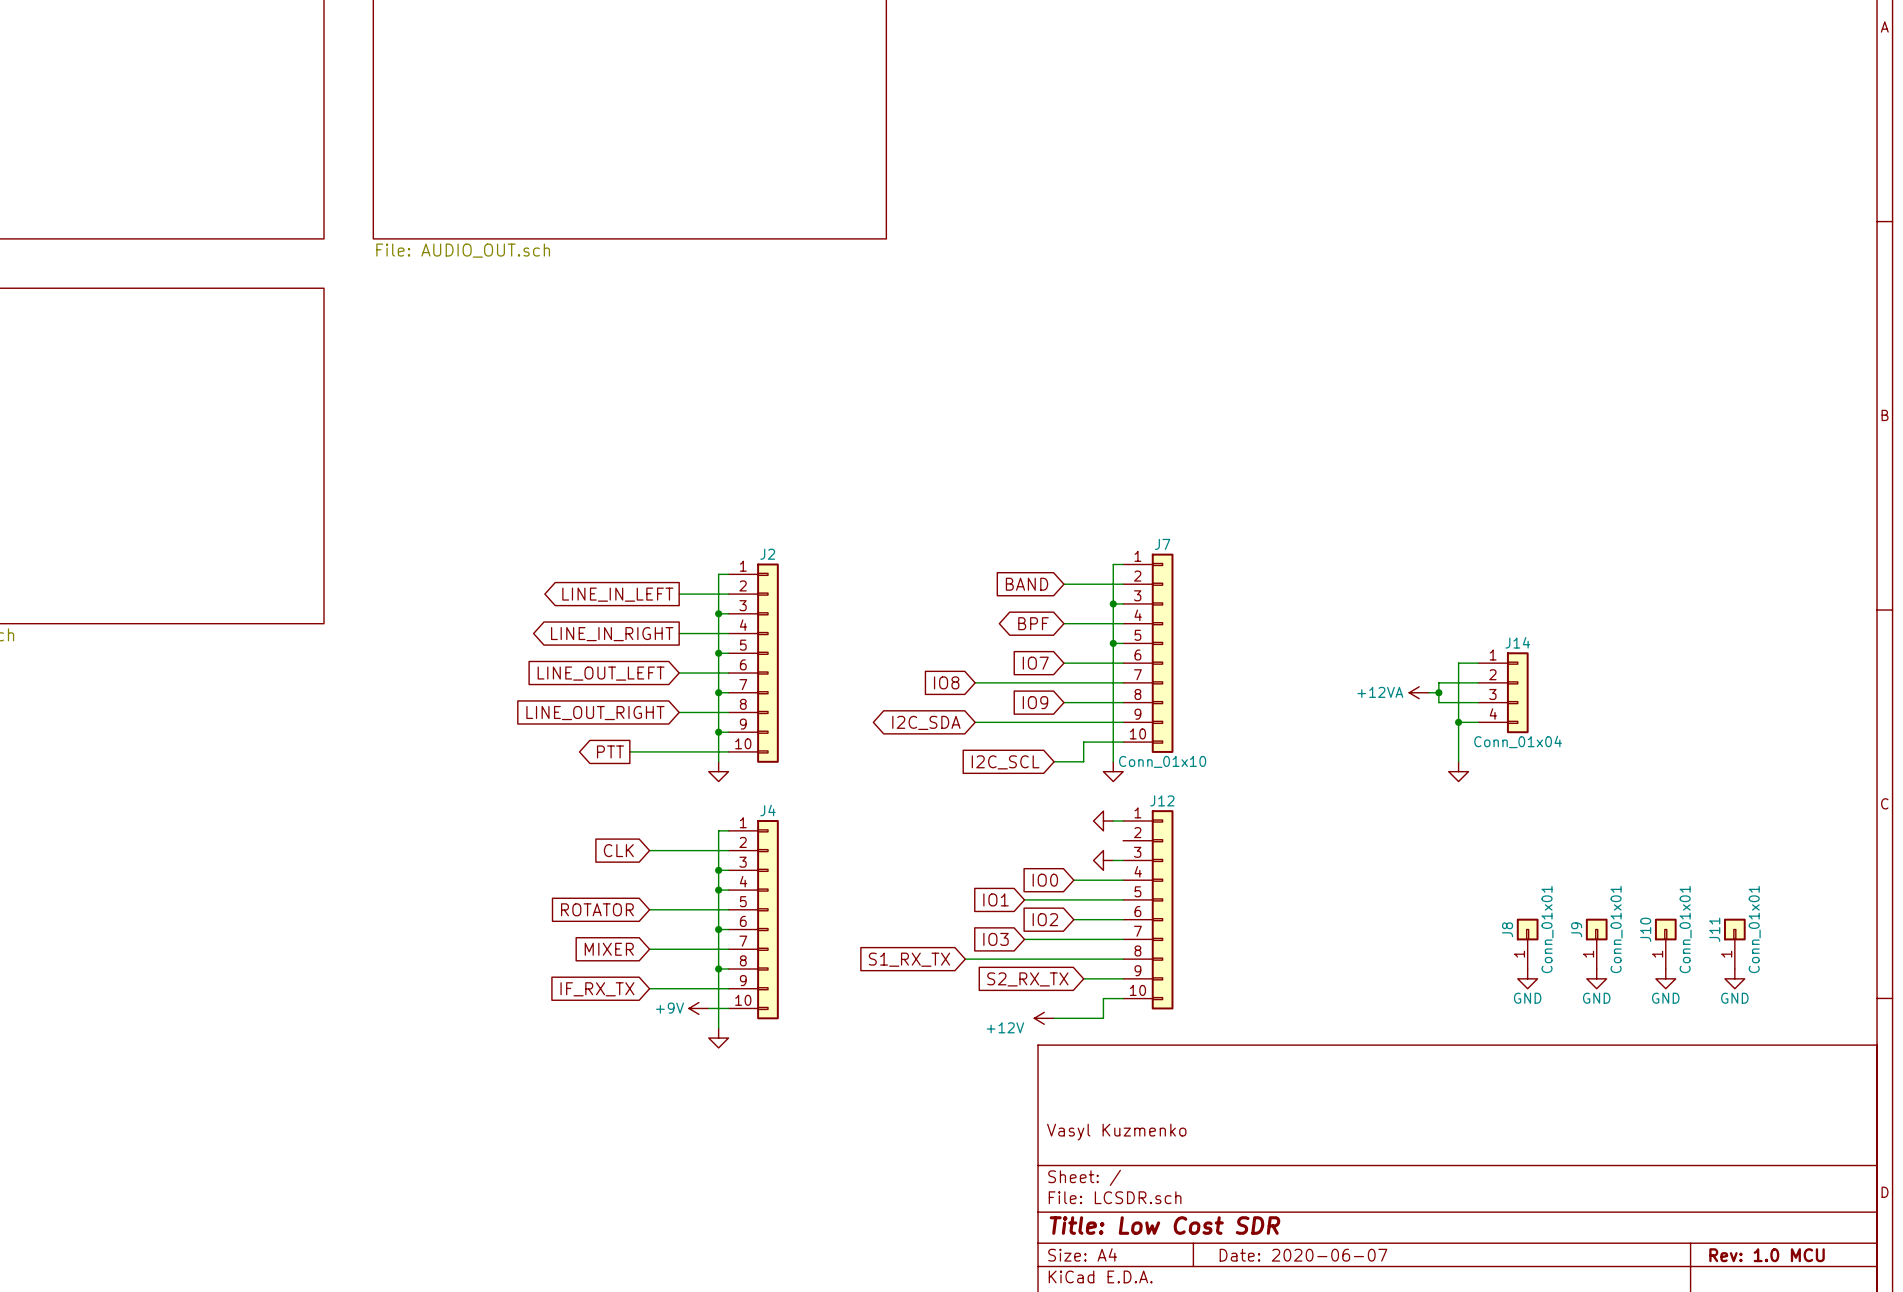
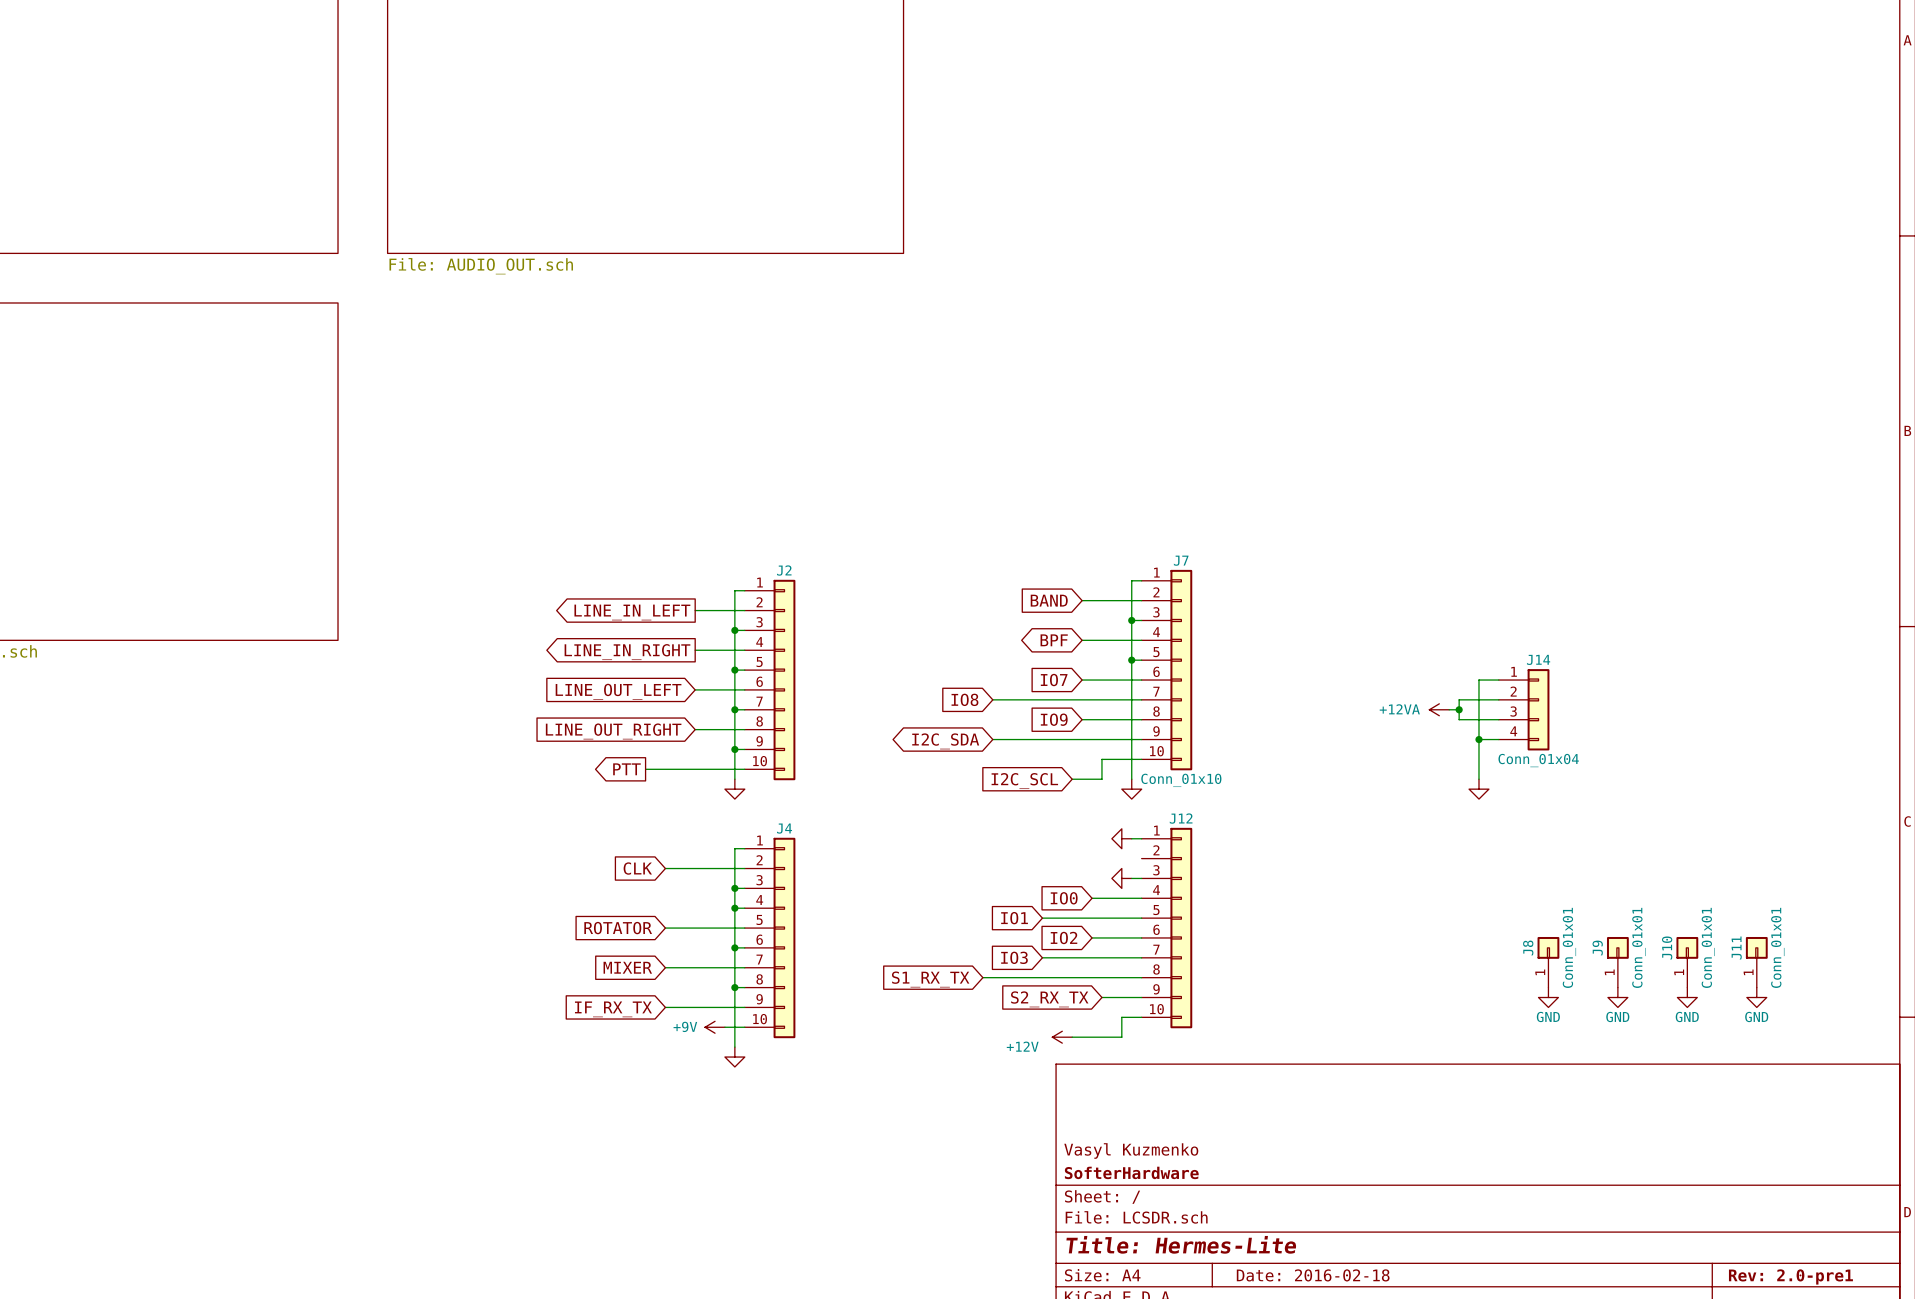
title block: none -> SofterHardware (1131, 1172)
title block: Title: Low Cost SDR (1165, 1225) -> Title: Hermes-Lite (1181, 1244)
title block: Date: 2020-06-07 (1303, 1255) -> Date: 2016-02-18 (1313, 1275)
title block: Rev: 1.0 MCU (1767, 1255) -> Rev: 2.0-pre1 (1790, 1276)

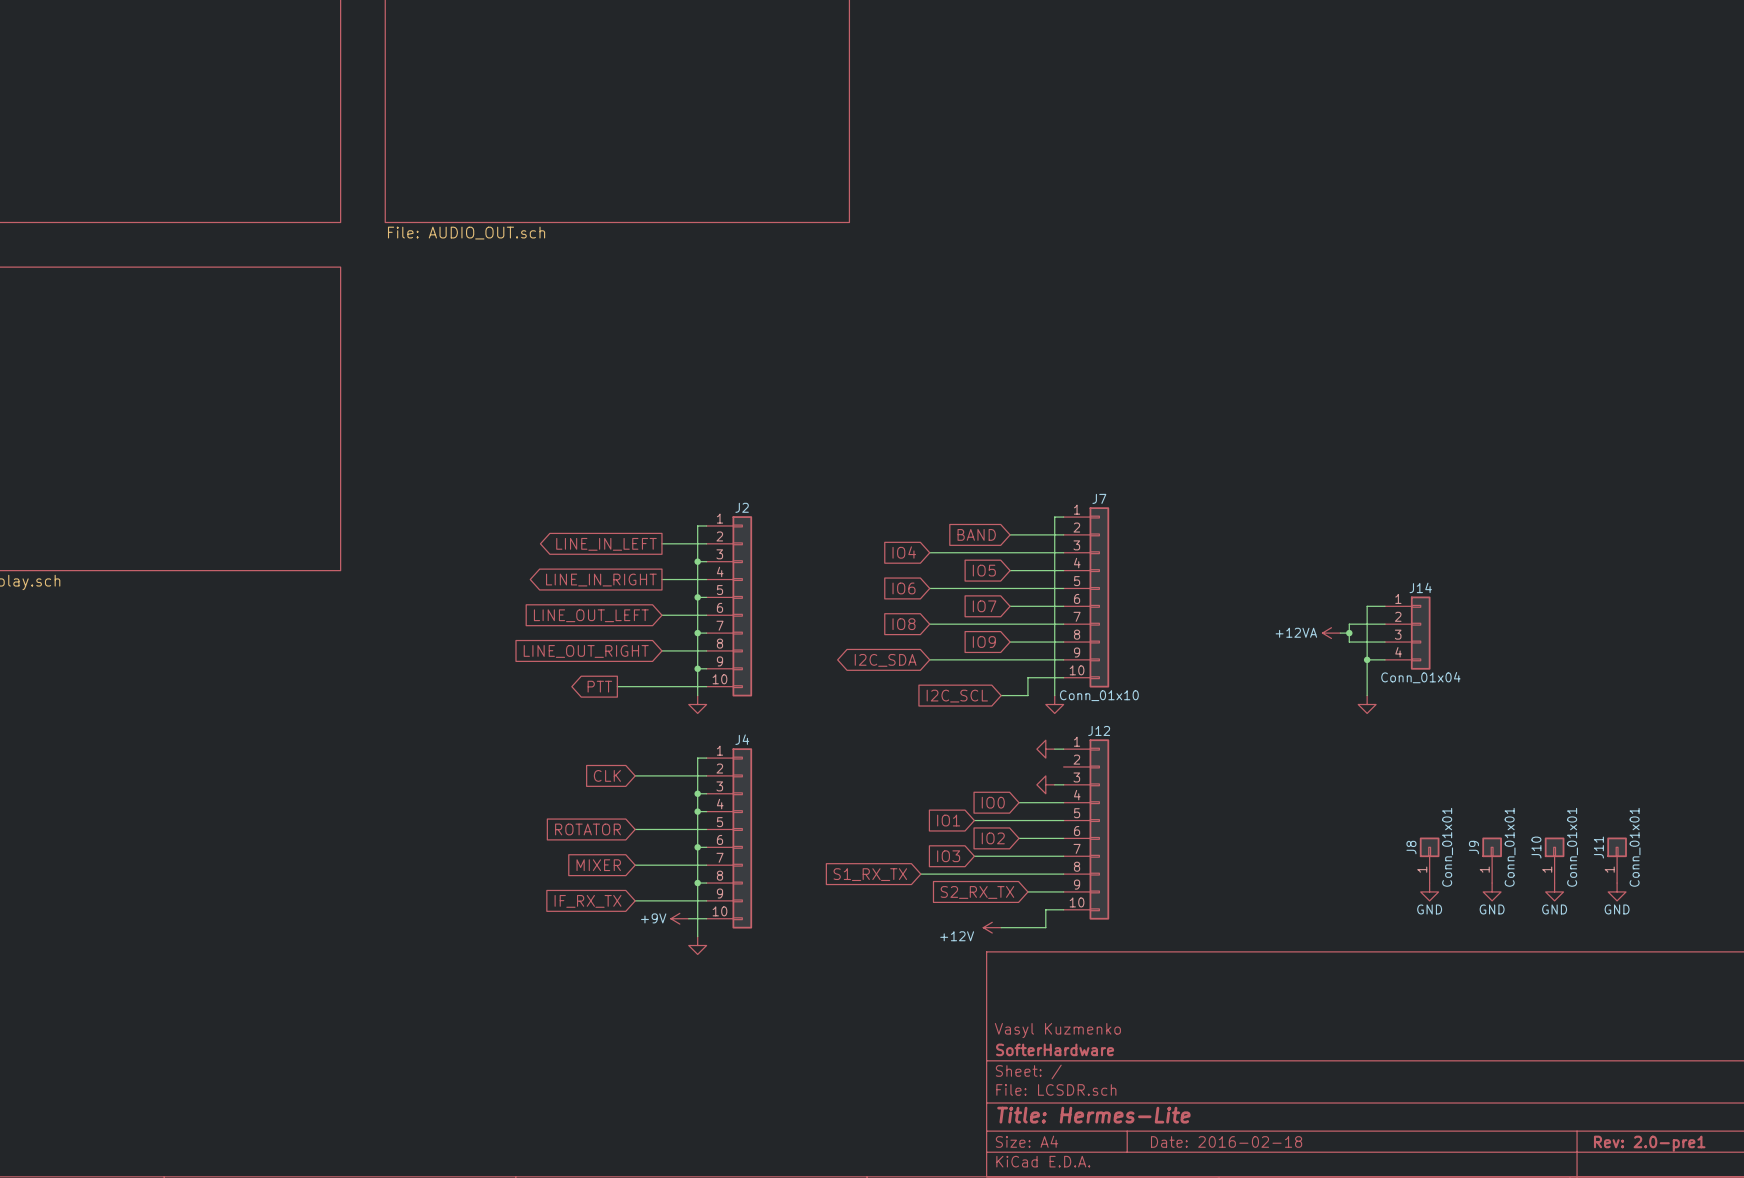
global label: none -> IO4 (904, 552)
wire: none -> (929, 552) (1054, 552)
junction: (1131, 620) -> none
global label shape: bidirectional (1054, 640) -> input (984, 570)
global label: BPF (1054, 640) -> IO5 (984, 570)
global label: none -> IO6 (904, 588)
wire: none -> (929, 588) (1054, 588)
junction: (1131, 660) -> none

